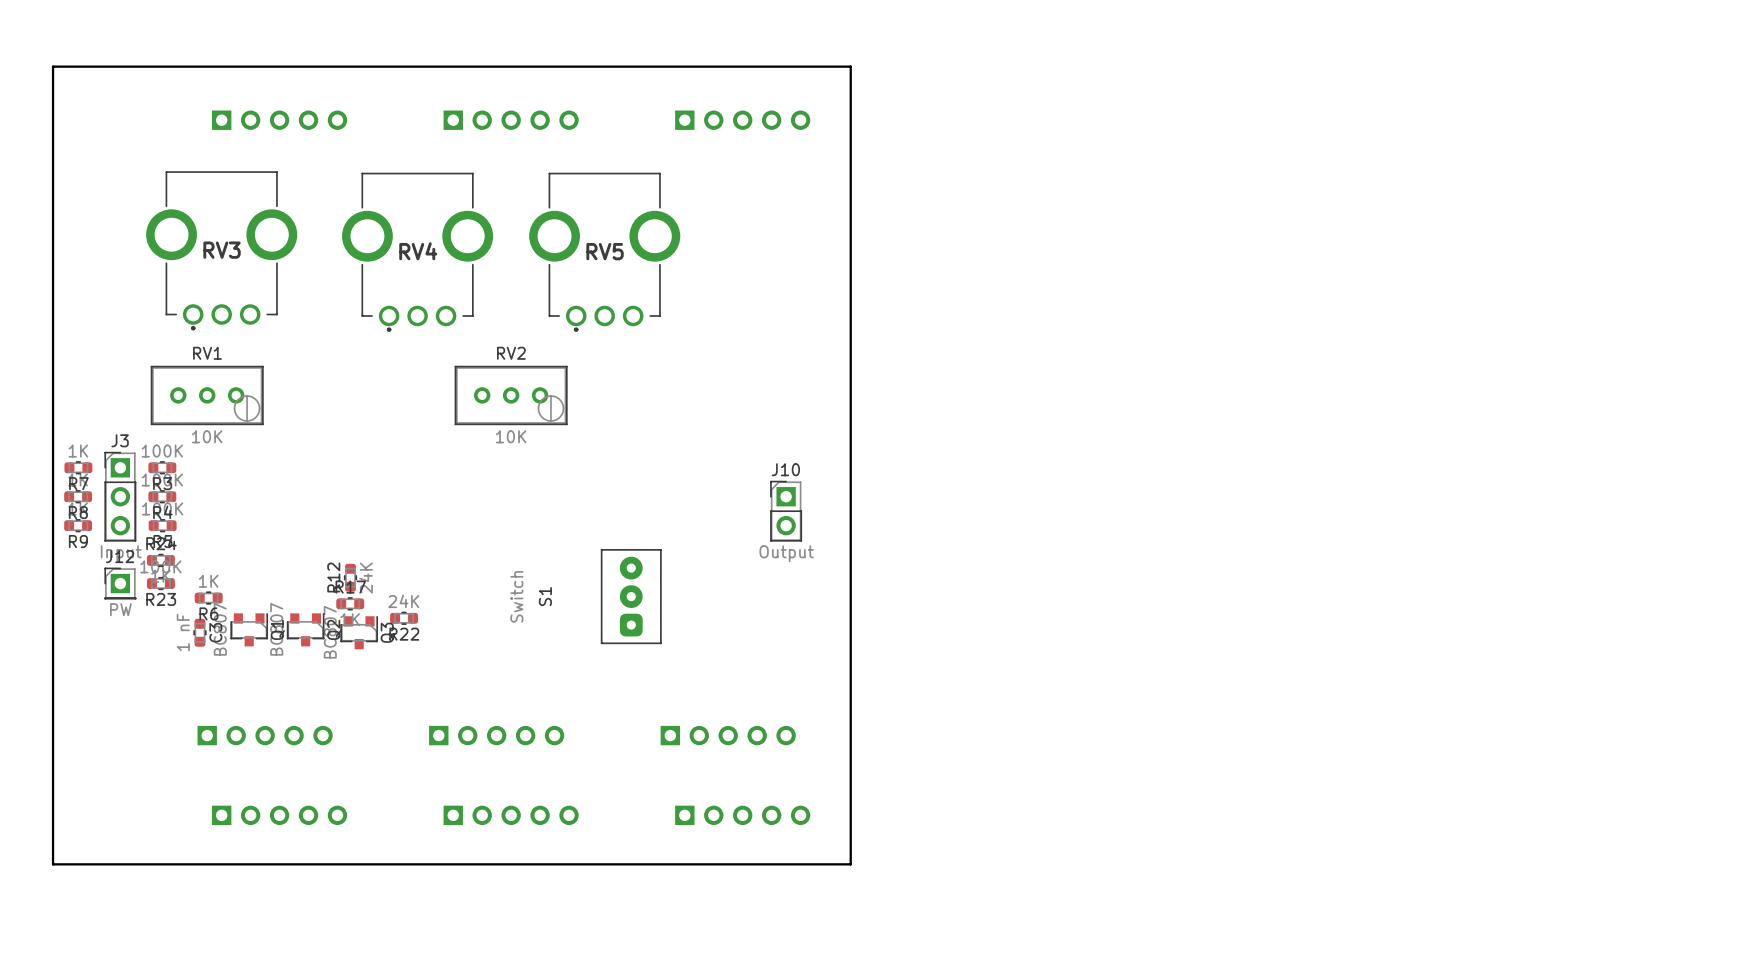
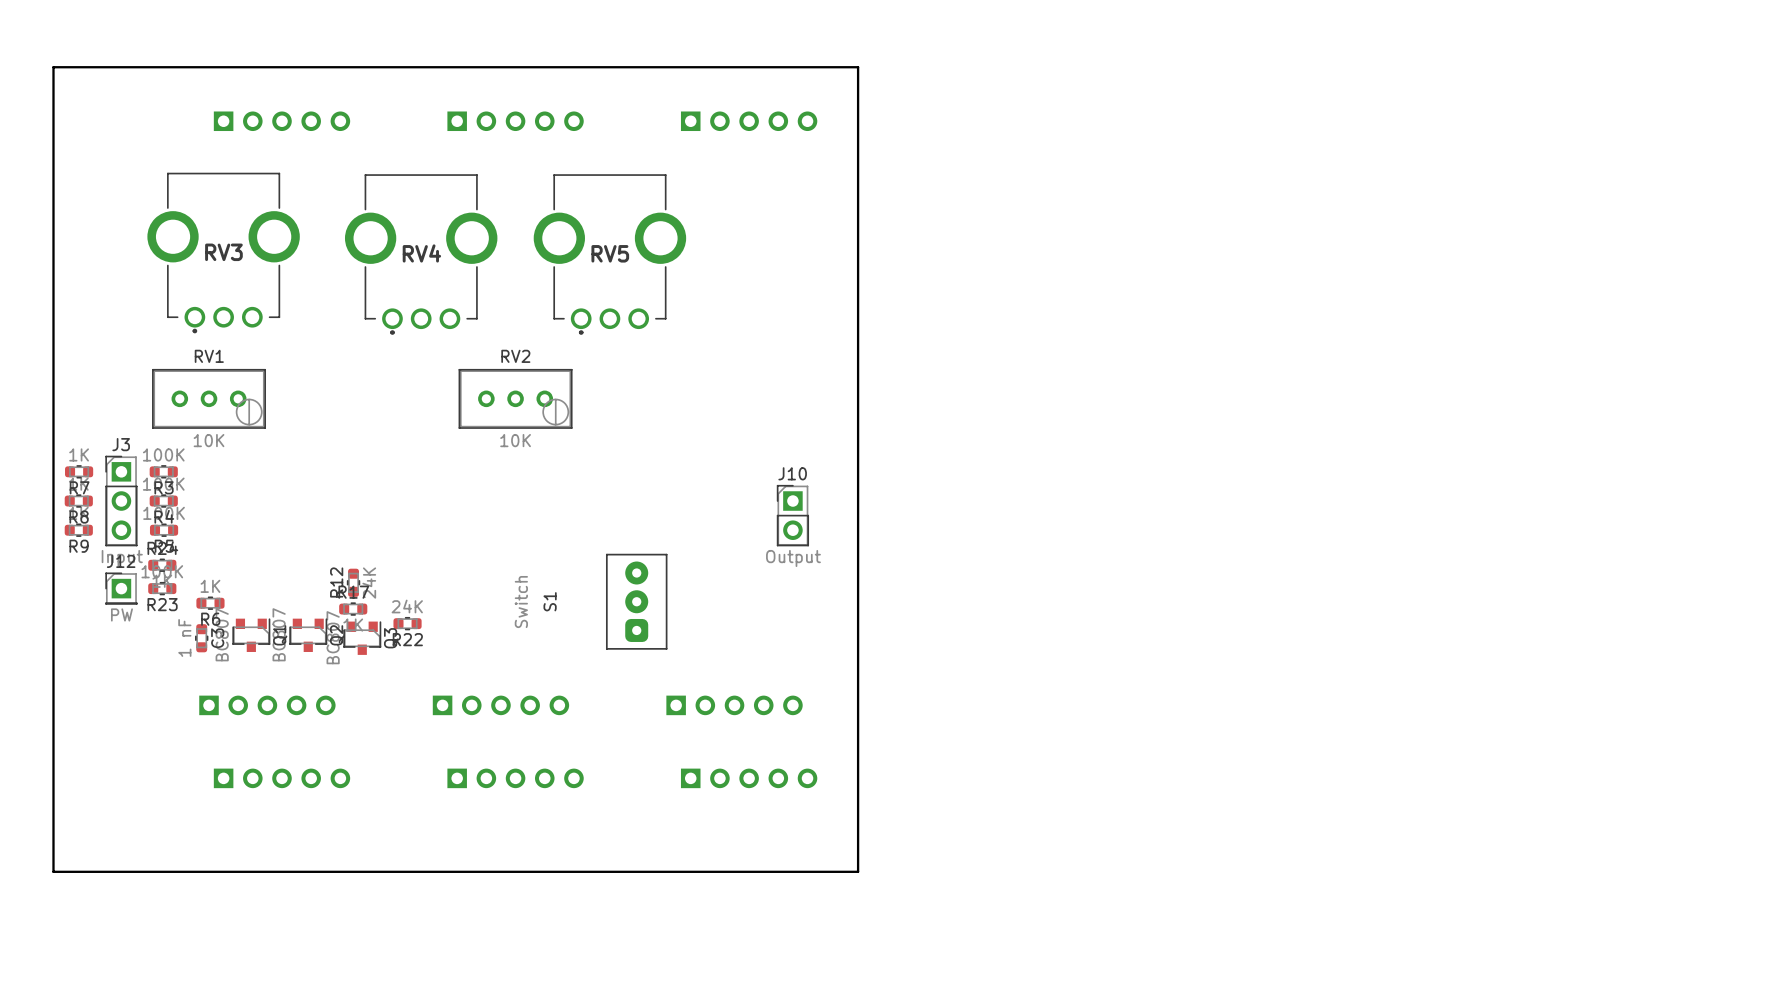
part: none -> (267, 705)
part: none -> (500, 705)
part: none -> (734, 705)
part: (265, 735) -> none
part: (496, 735) -> none
part: (728, 735) -> none
part: none -> (282, 778)
part: none -> (515, 778)
part: none -> (749, 778)
part: (279, 815) -> none
part: (511, 815) -> none
part: (742, 815) -> none

